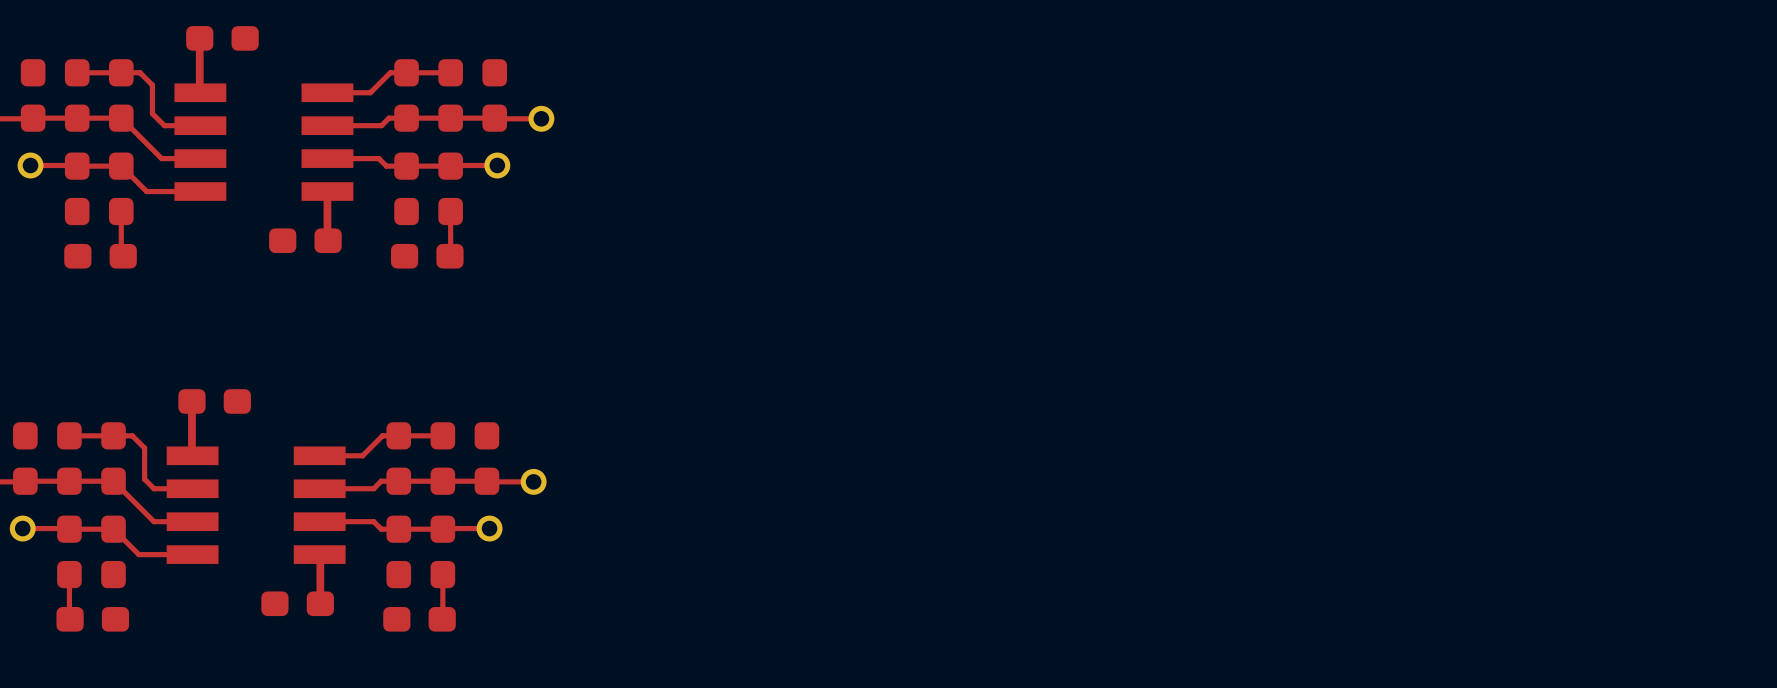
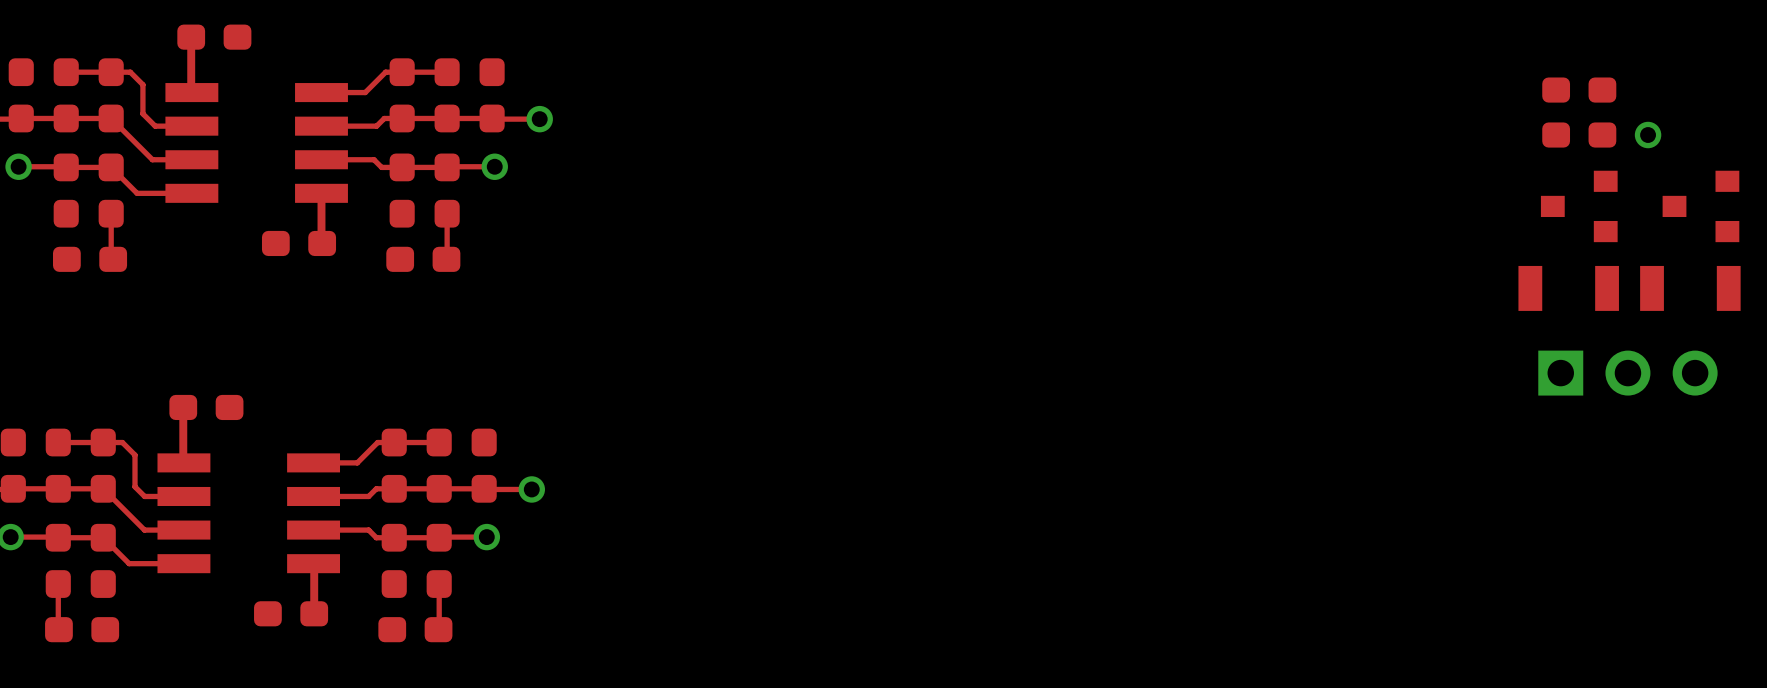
part: none -> (1579, 90)
part: none -> (1579, 135)
part: none -> (1648, 135)
part: none -> (1579, 206)
part: none -> (1700, 206)
part: none -> (1568, 288)
part: none -> (1690, 288)
part: none -> (1627, 373)

